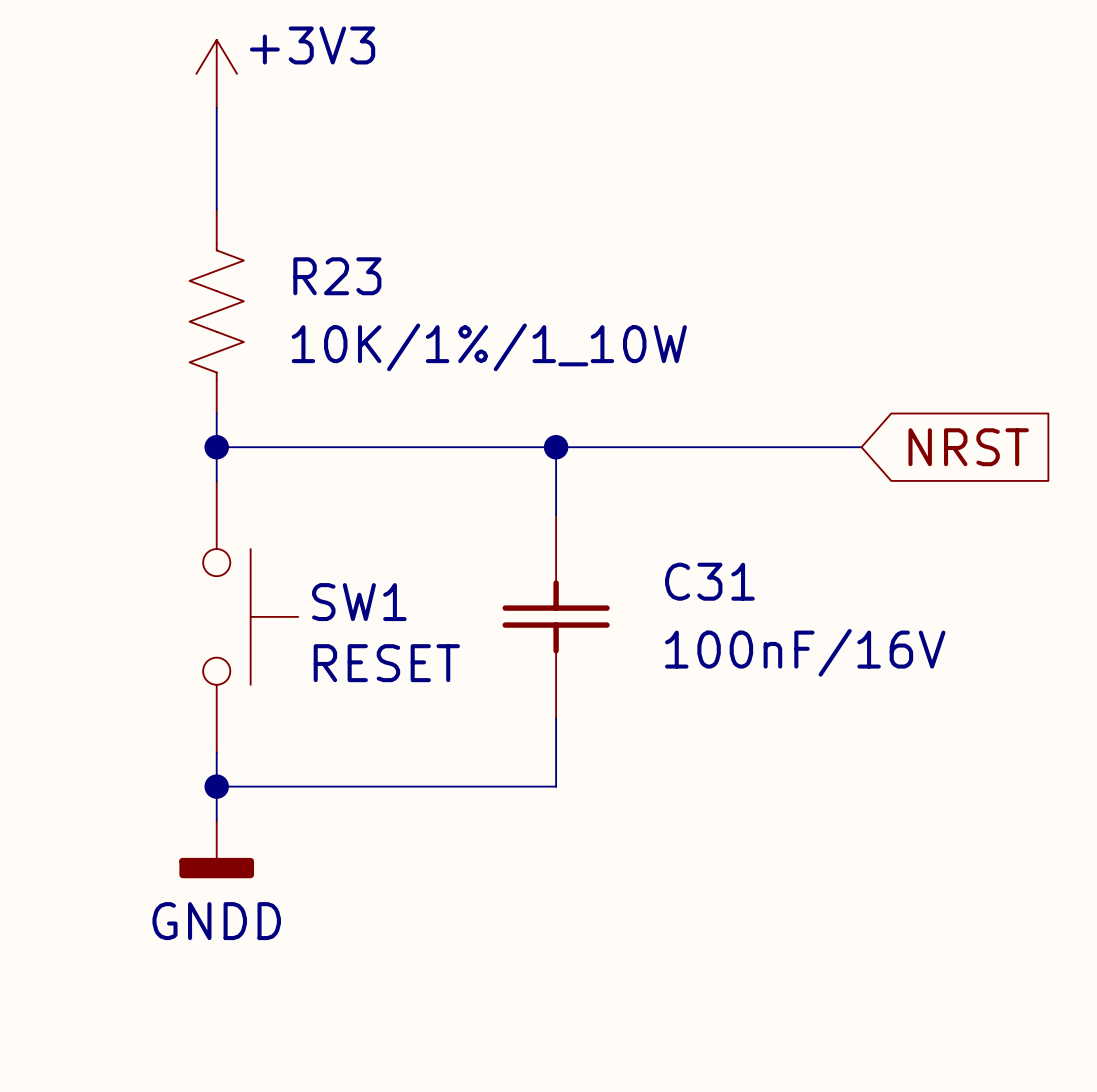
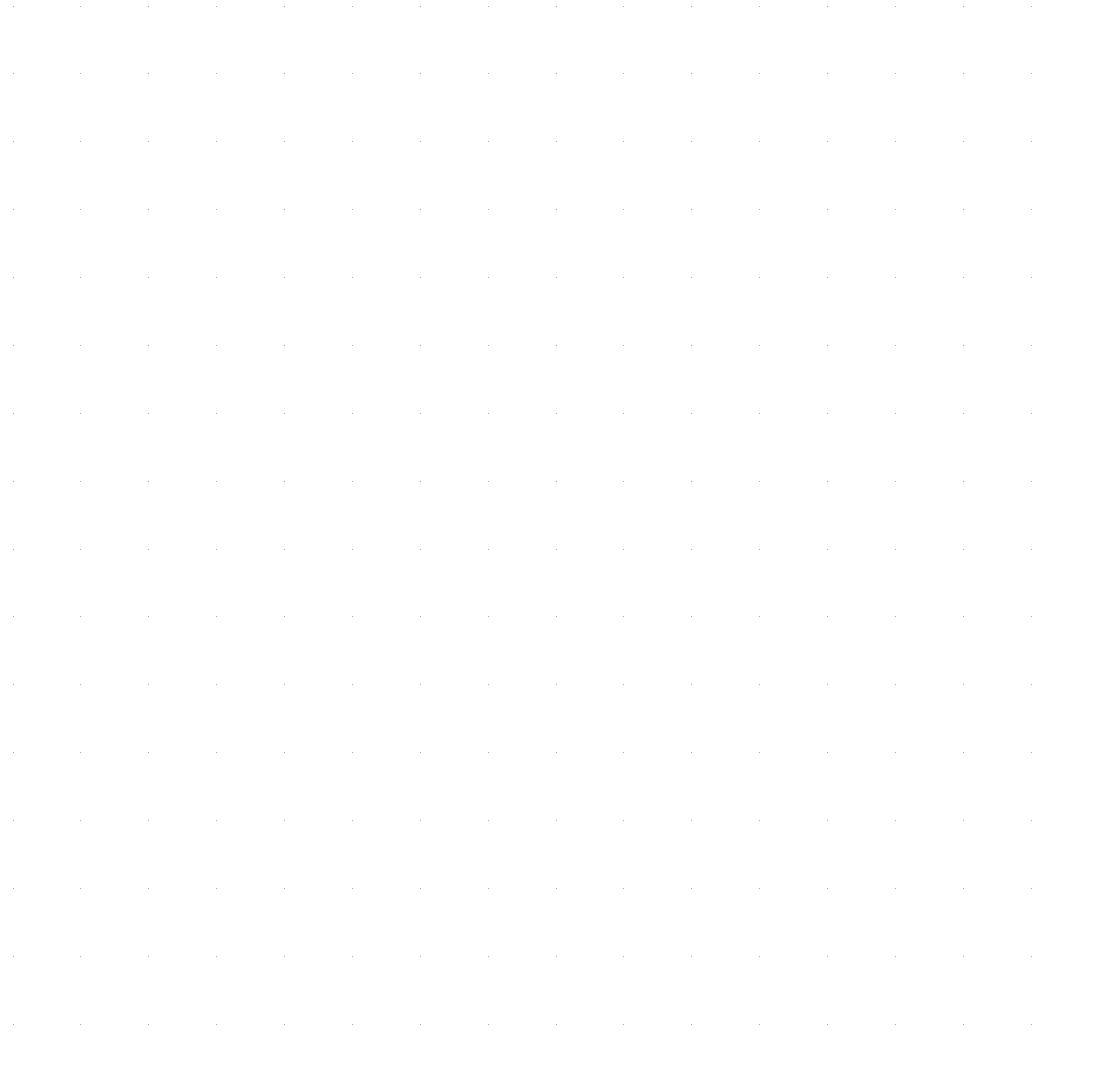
power symbol: +3V3 (216, 73) -> none
wire: (216, 107) (216, 209) -> none
R23: 10K/1%/1_10W (216, 311) -> none
wire: (216, 413) (216, 481) -> none
wire: (216, 447) (861, 447) -> none
junction: (216, 447) -> none
wire: (556, 447) (556, 515) -> none
junction: (556, 447) -> none
global label: NRST (968, 447) -> none
SW1: RESET (250, 616) -> none
C31: 100nF/16V (556, 616) -> none
wire: (556, 718) (556, 786) (216, 786) -> none
wire: (216, 752) (216, 820) -> none
junction: (216, 786) -> none
power symbol: GNDD (216, 849) -> none

